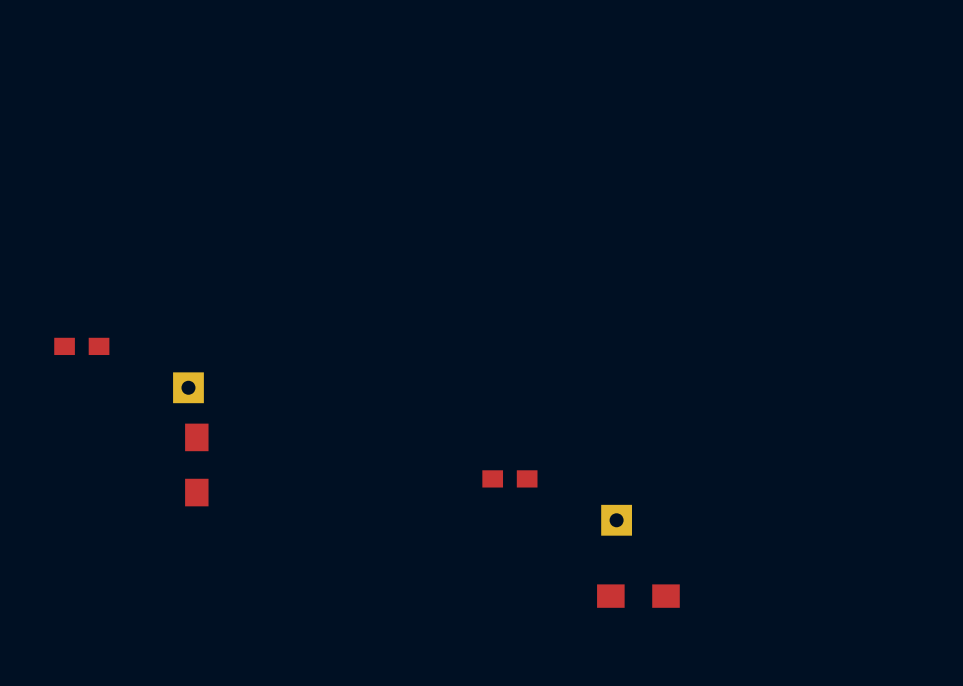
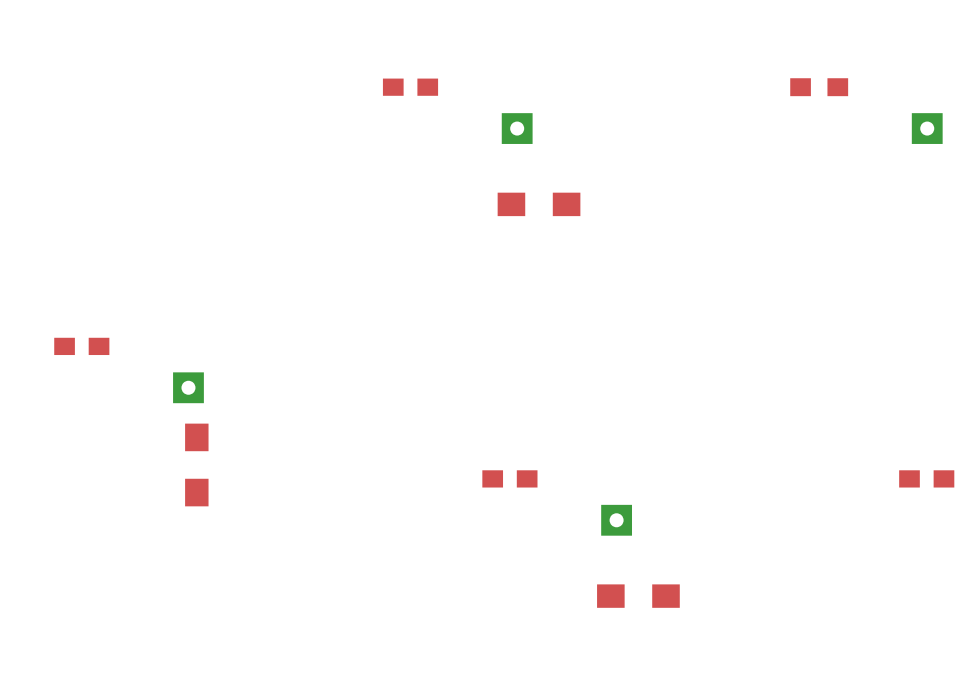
part: none -> (410, 87)
part: none -> (819, 87)
part: none -> (517, 128)
part: none -> (927, 128)
part: none -> (539, 204)
part: none -> (926, 478)

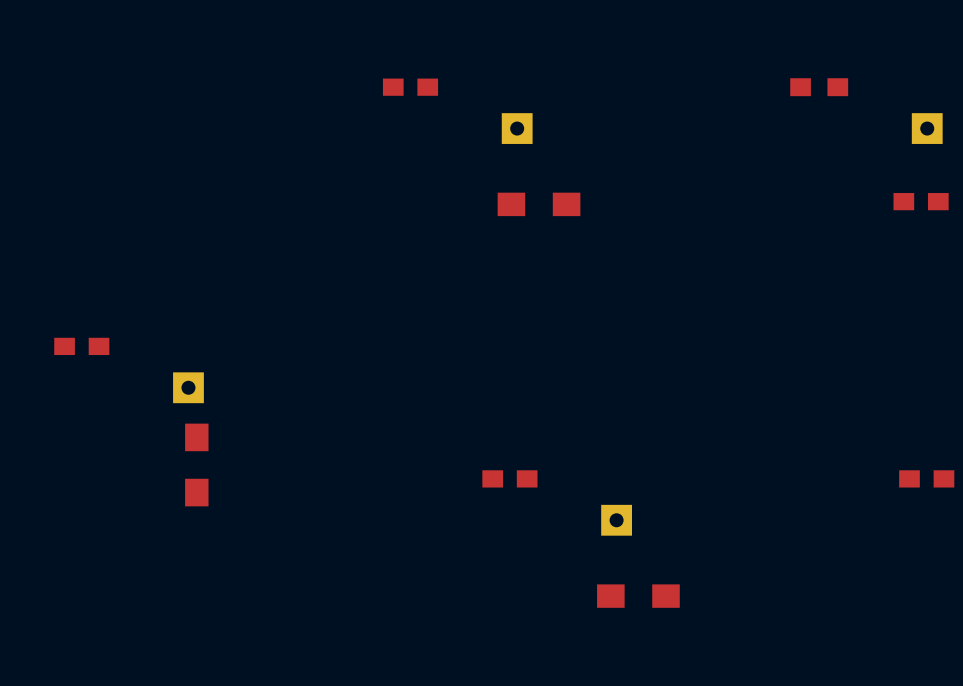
part: none -> (921, 201)

